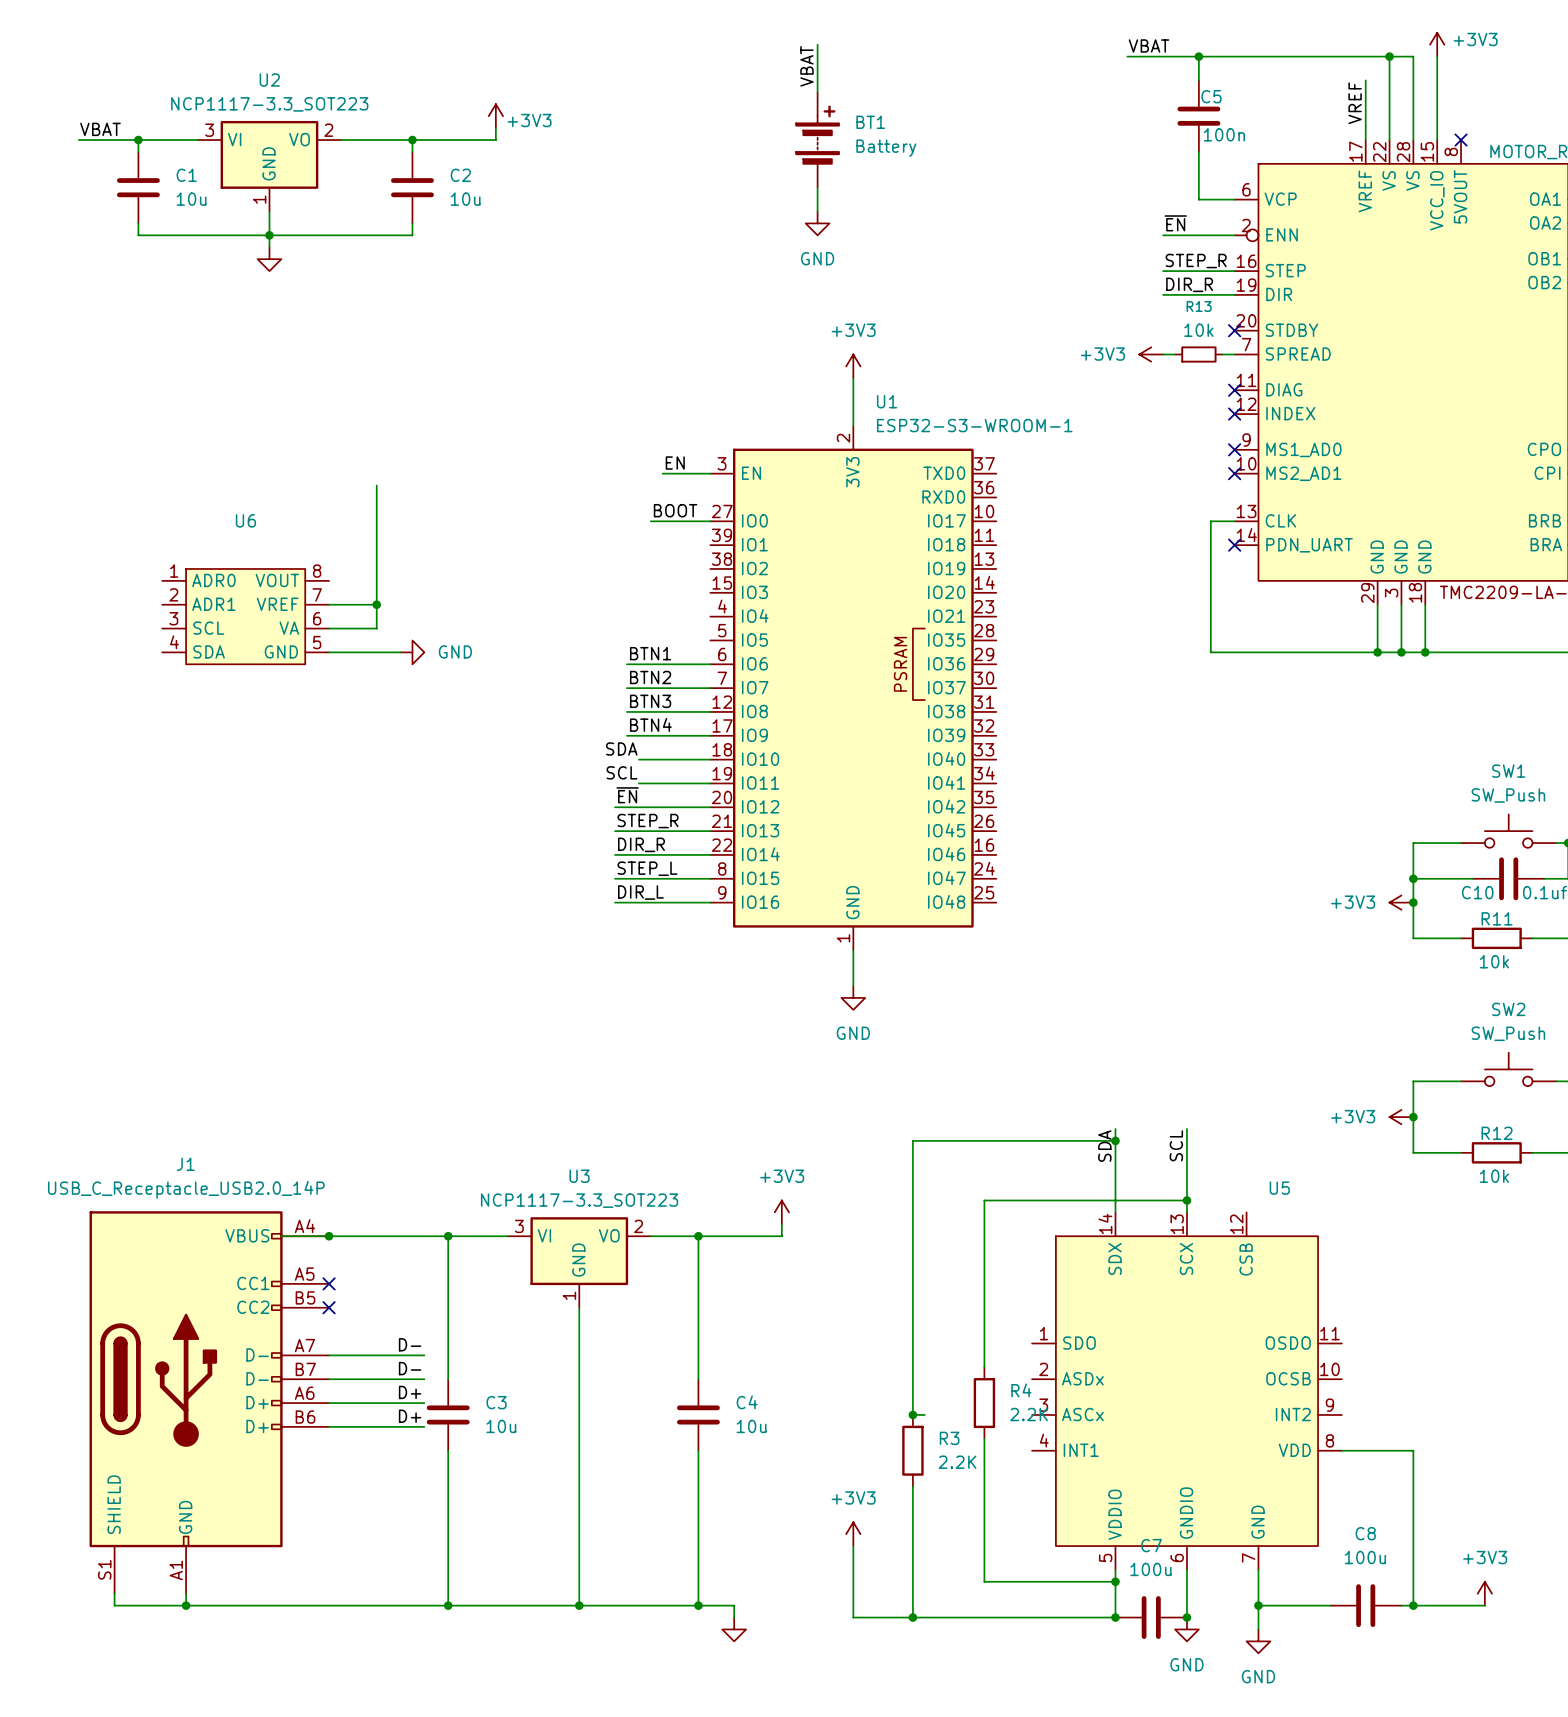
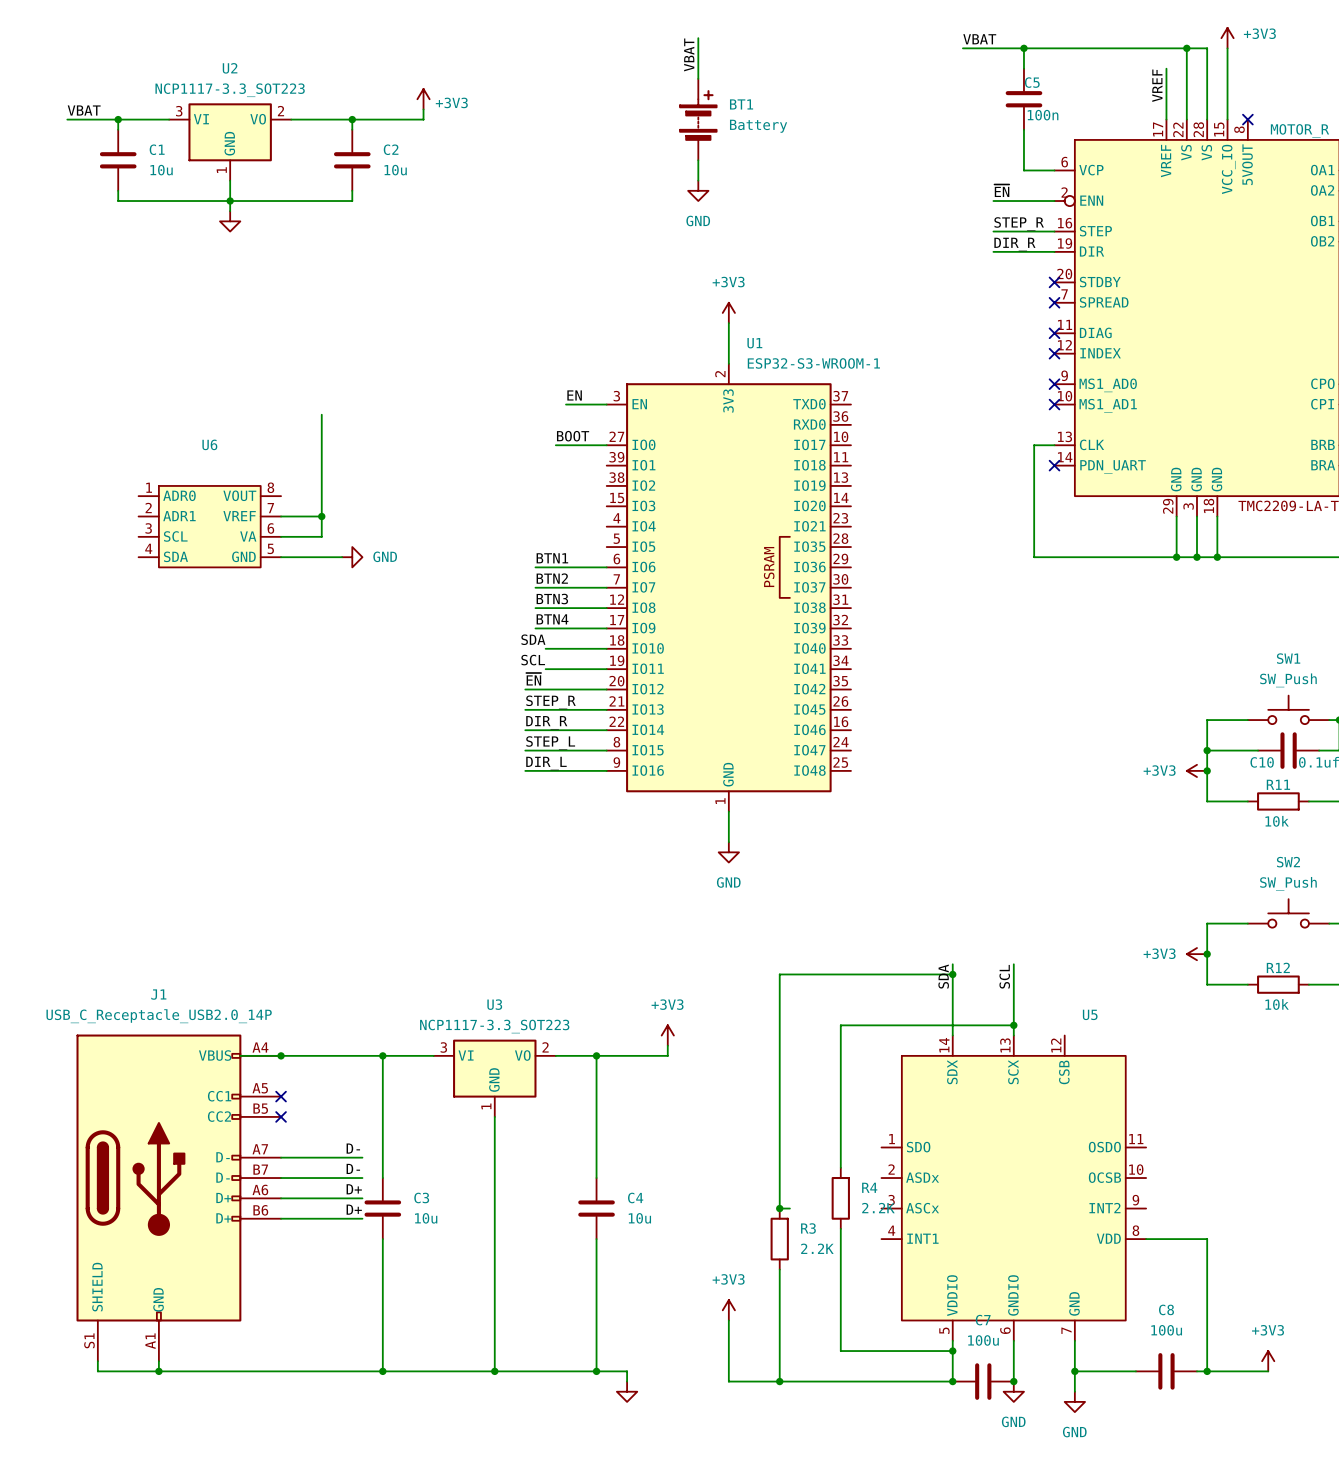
power symbol: +3V3 (1151, 354) -> none
wire: (1163, 354) (1175, 354) -> none
R13: 10k (1198, 354) -> none
wire: (1222, 354) (1234, 354) -> none
no-connect mark: none -> (1054, 302)
part pin name: MS2_AD1 (1303, 473) -> MS1_AD1 (1108, 405)

